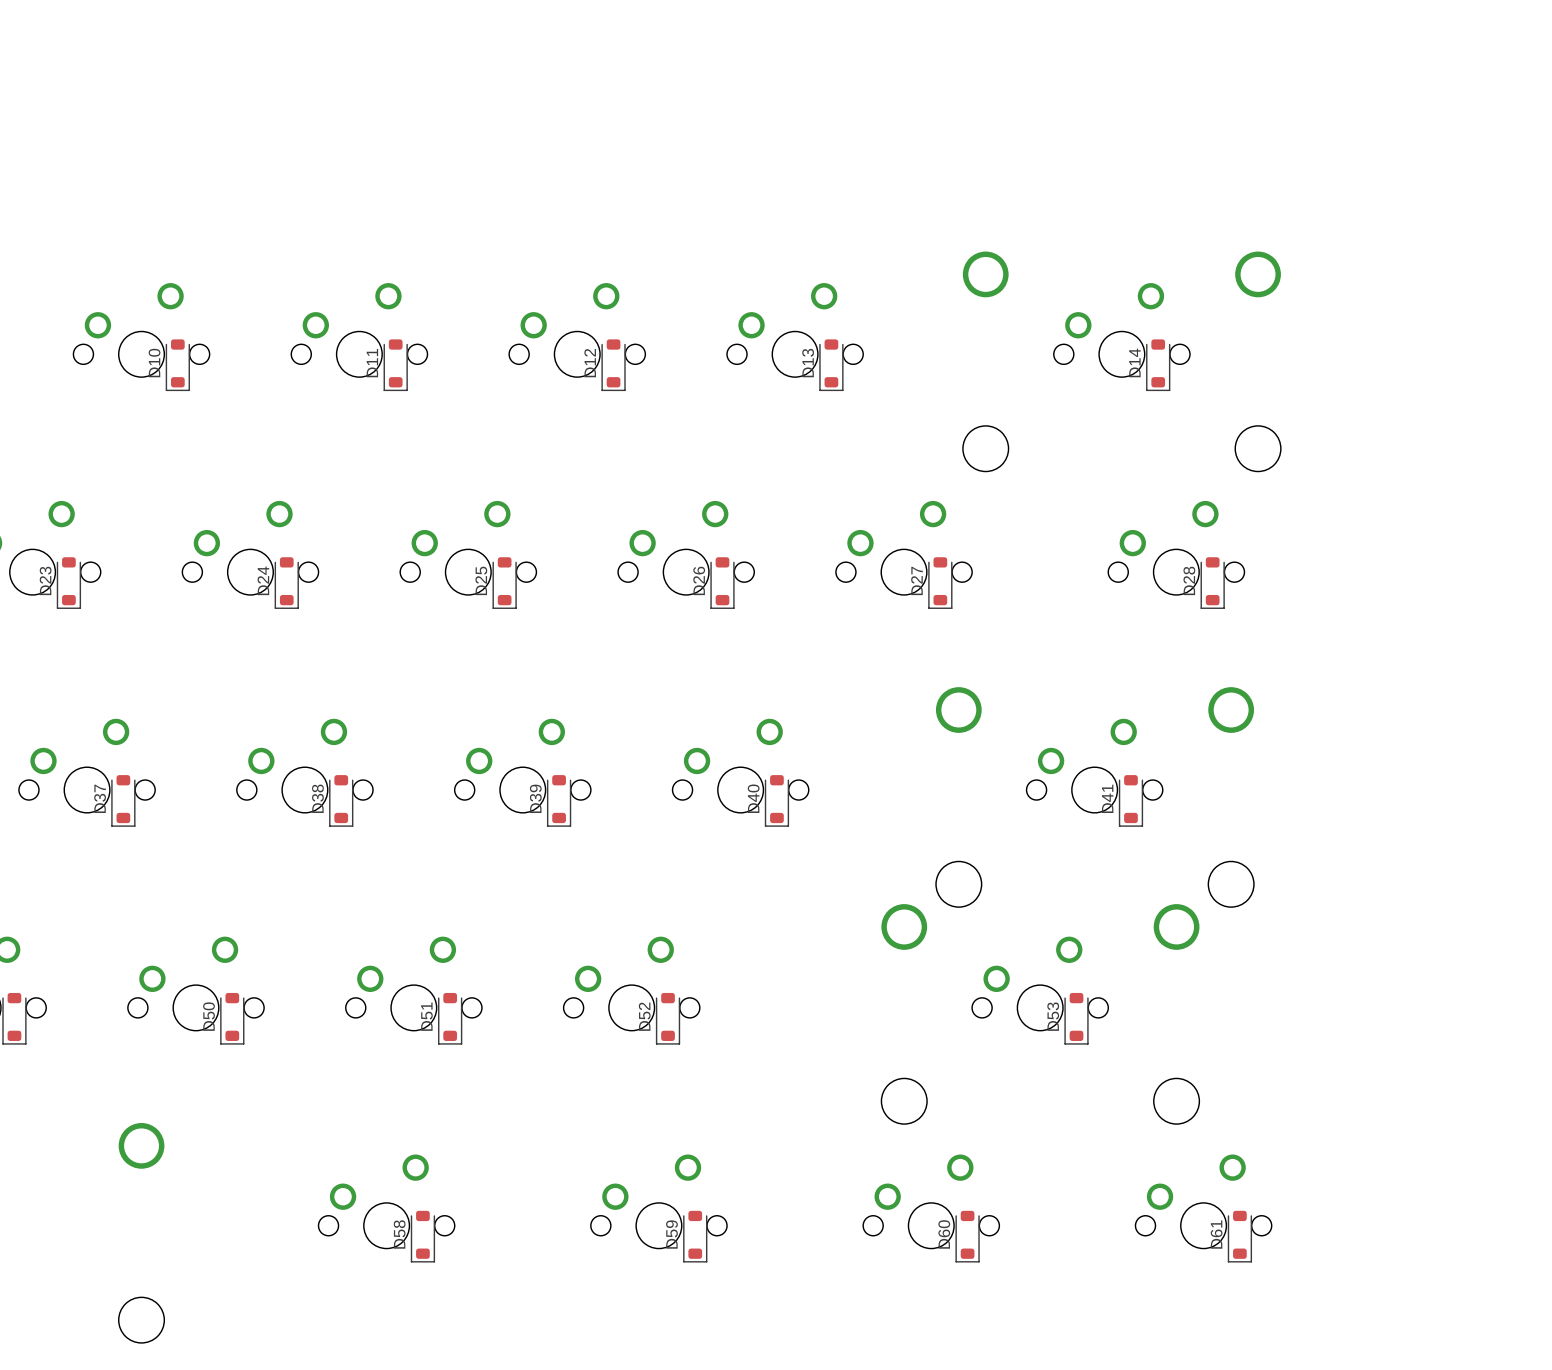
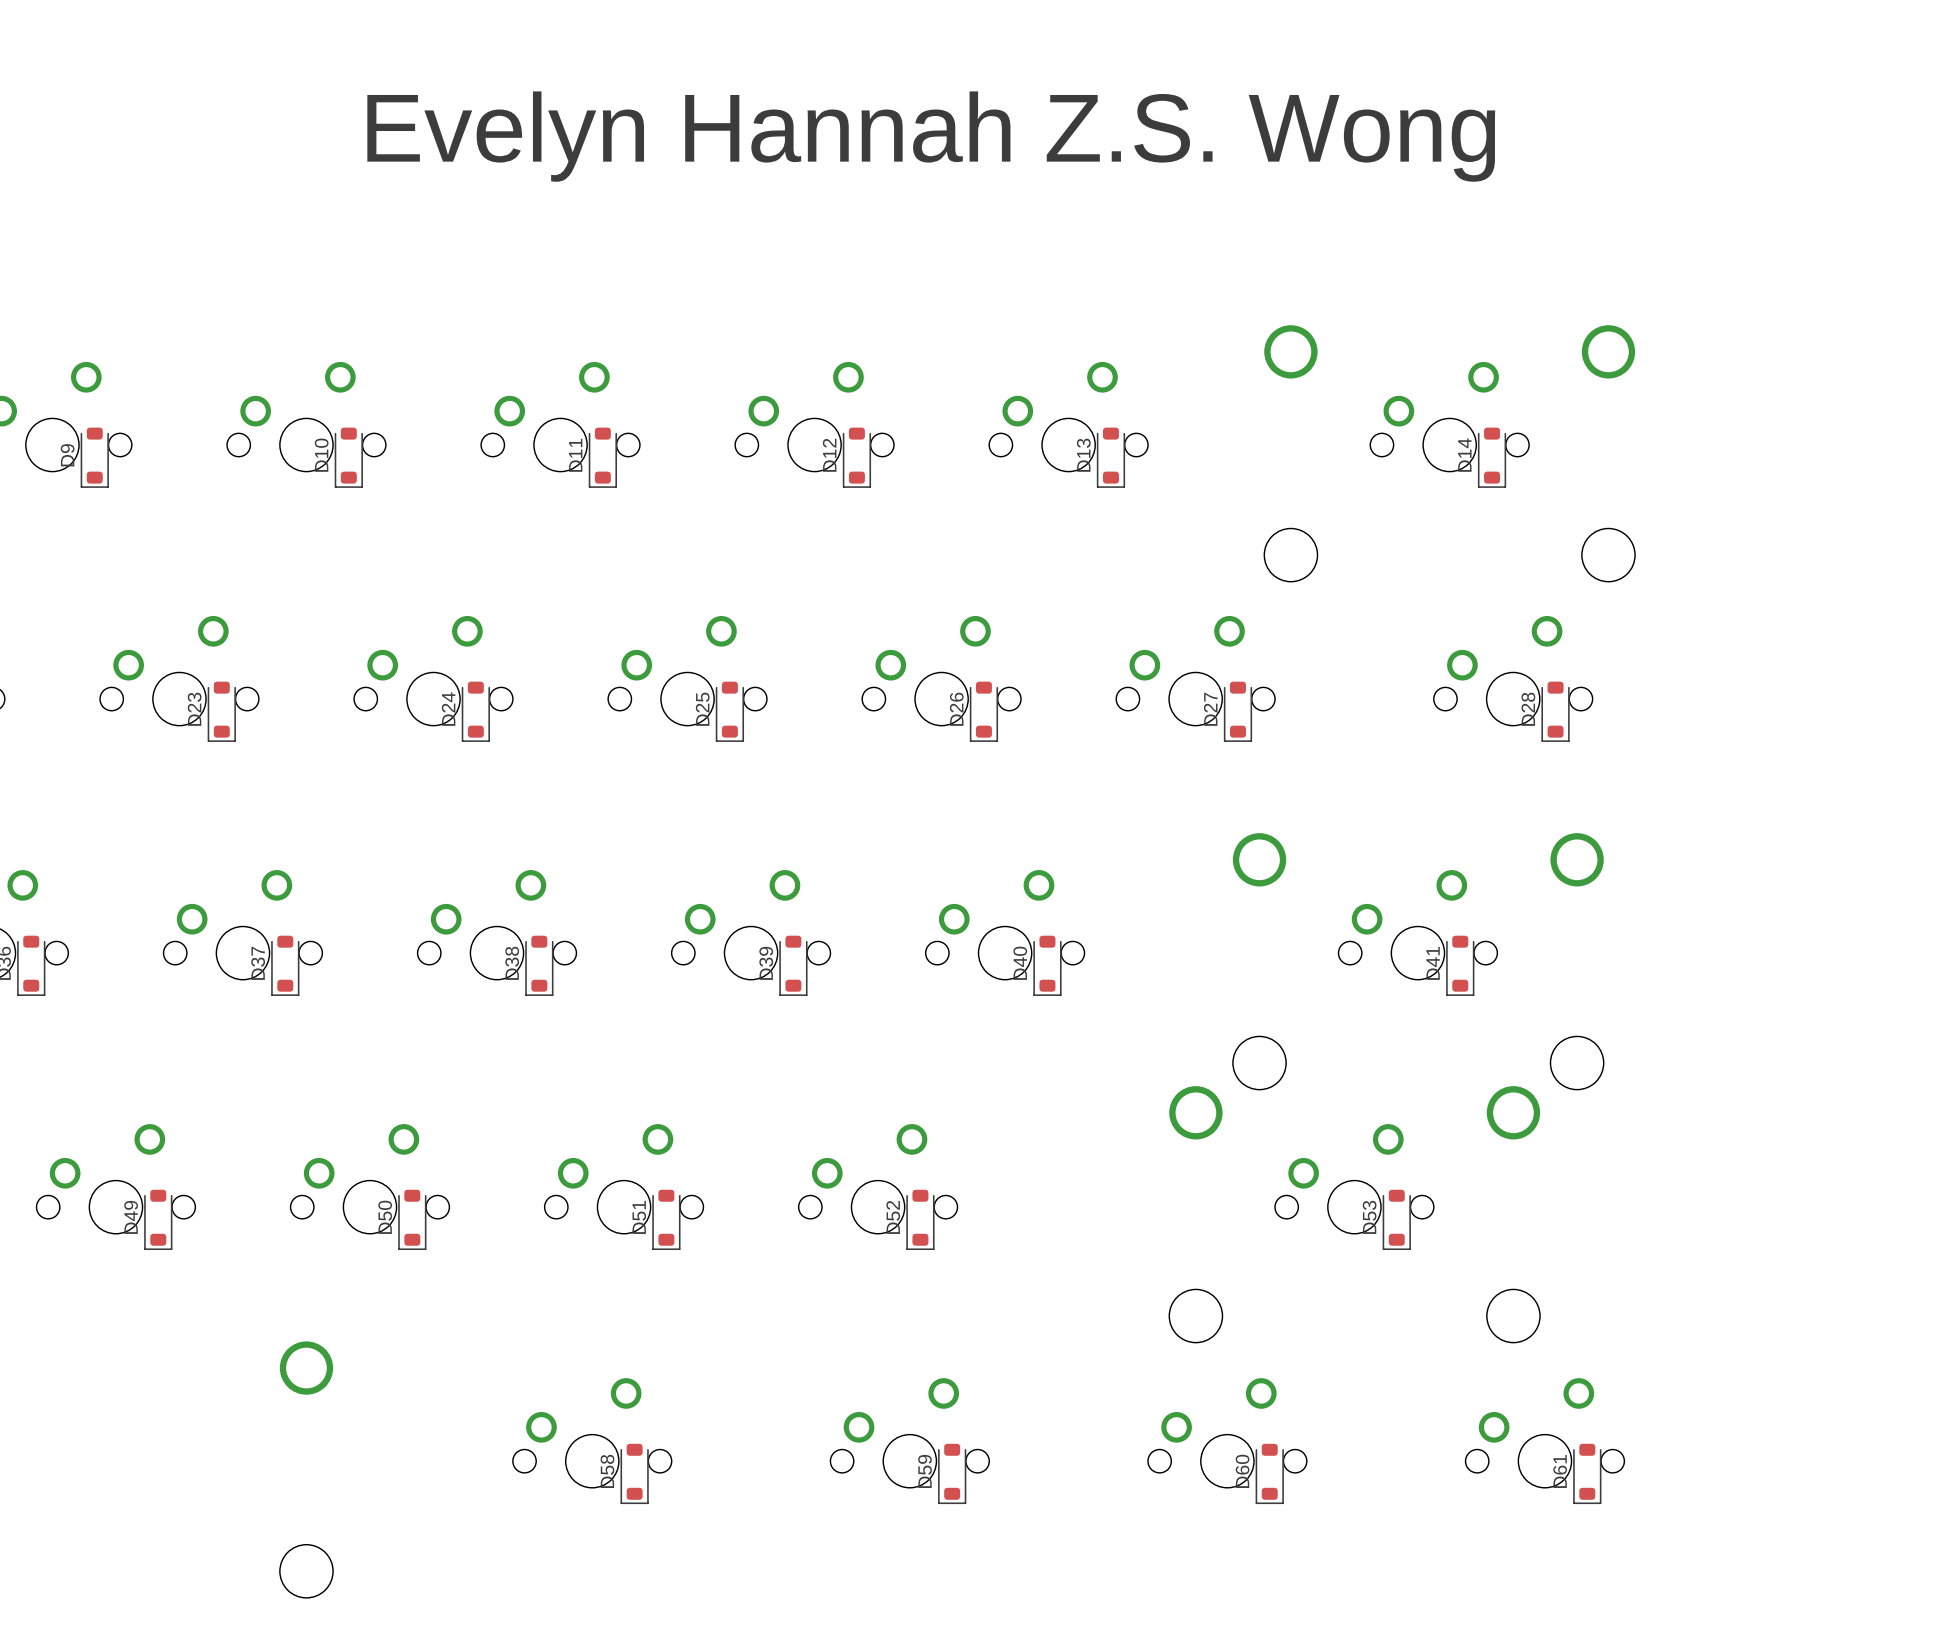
text: none -> Evelyn Hannah Z.S. Wong (931, 136)

